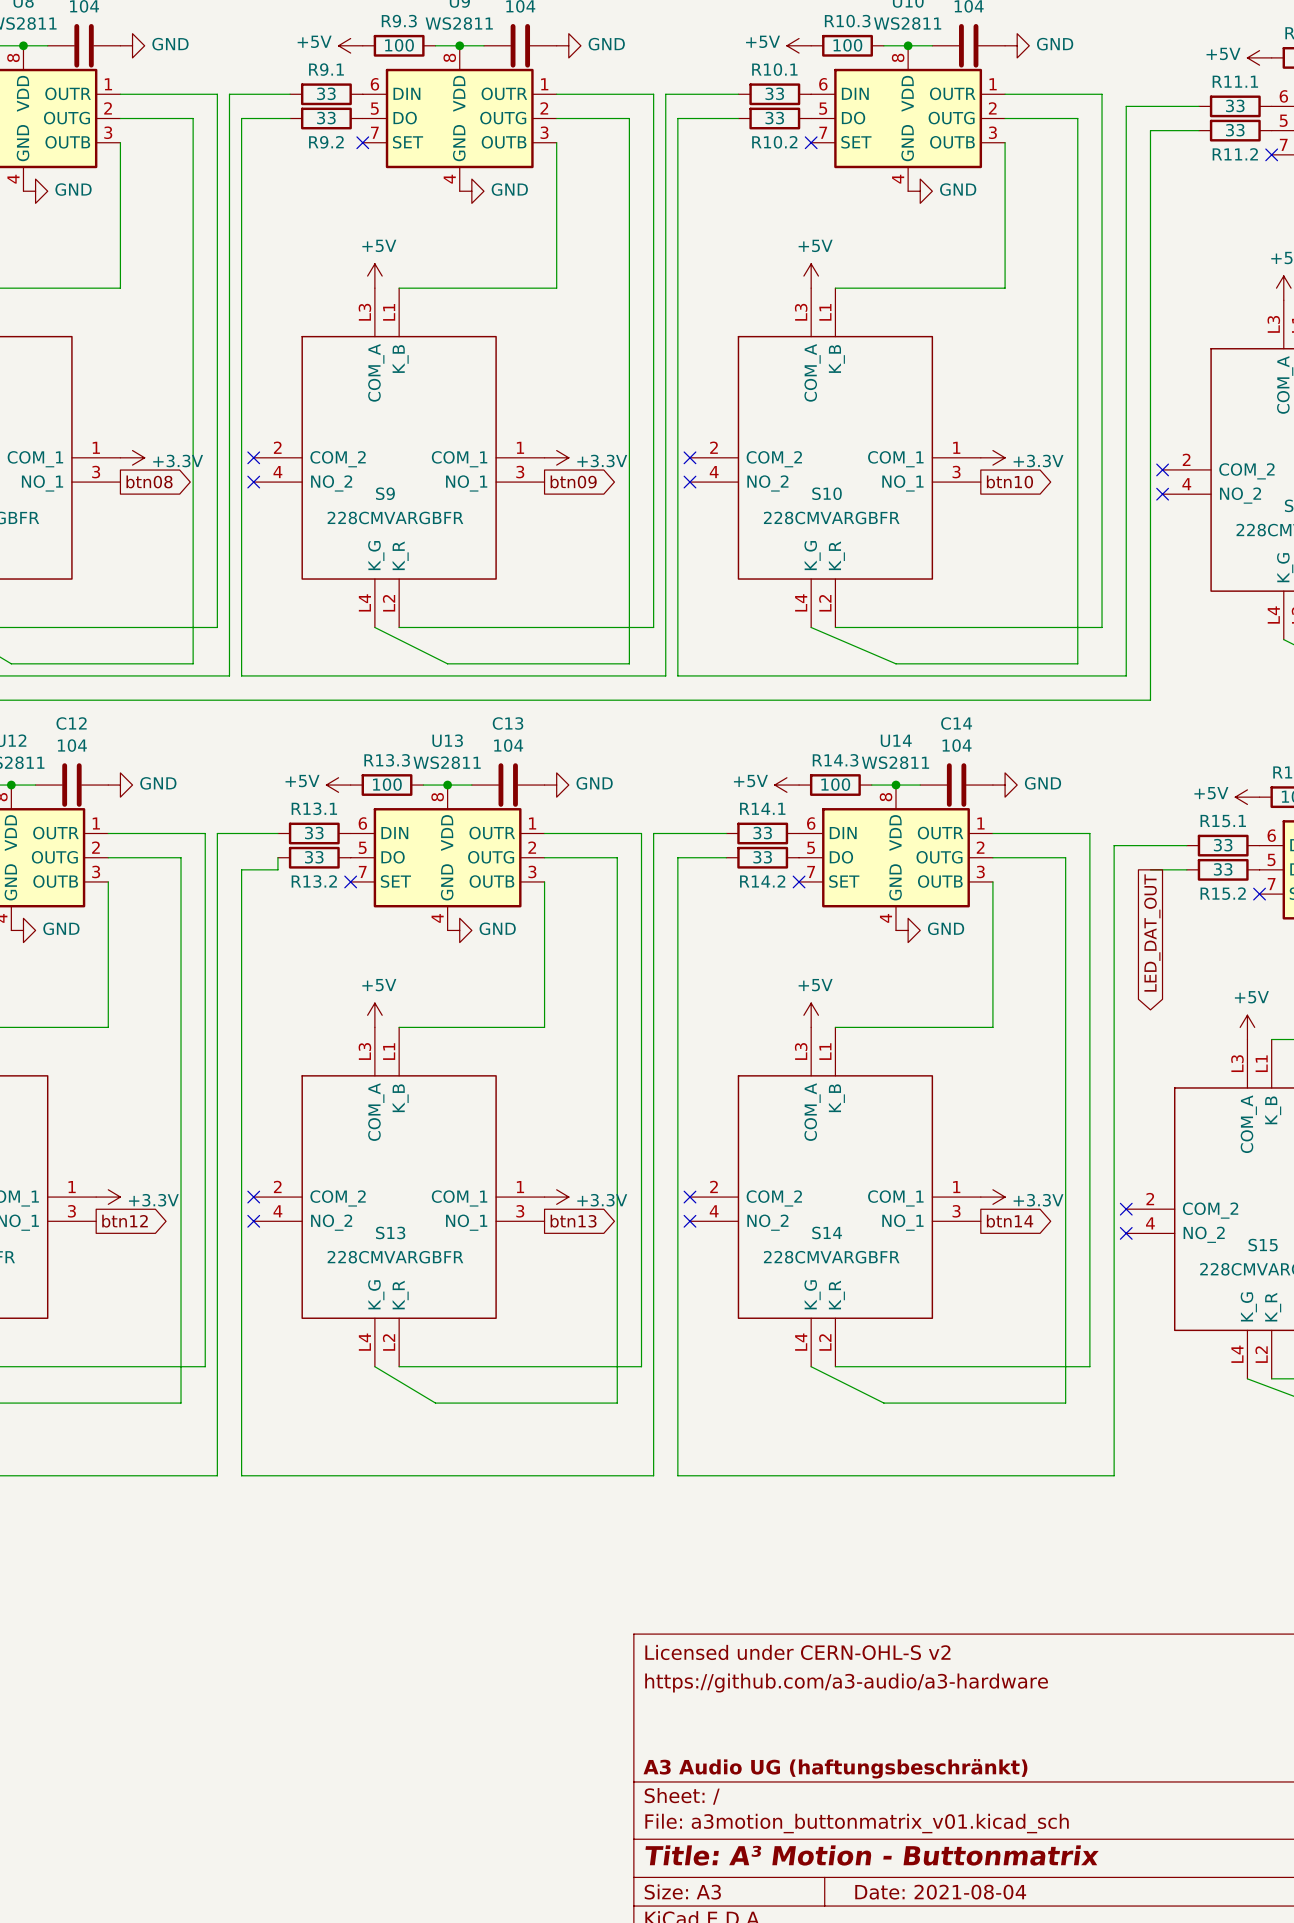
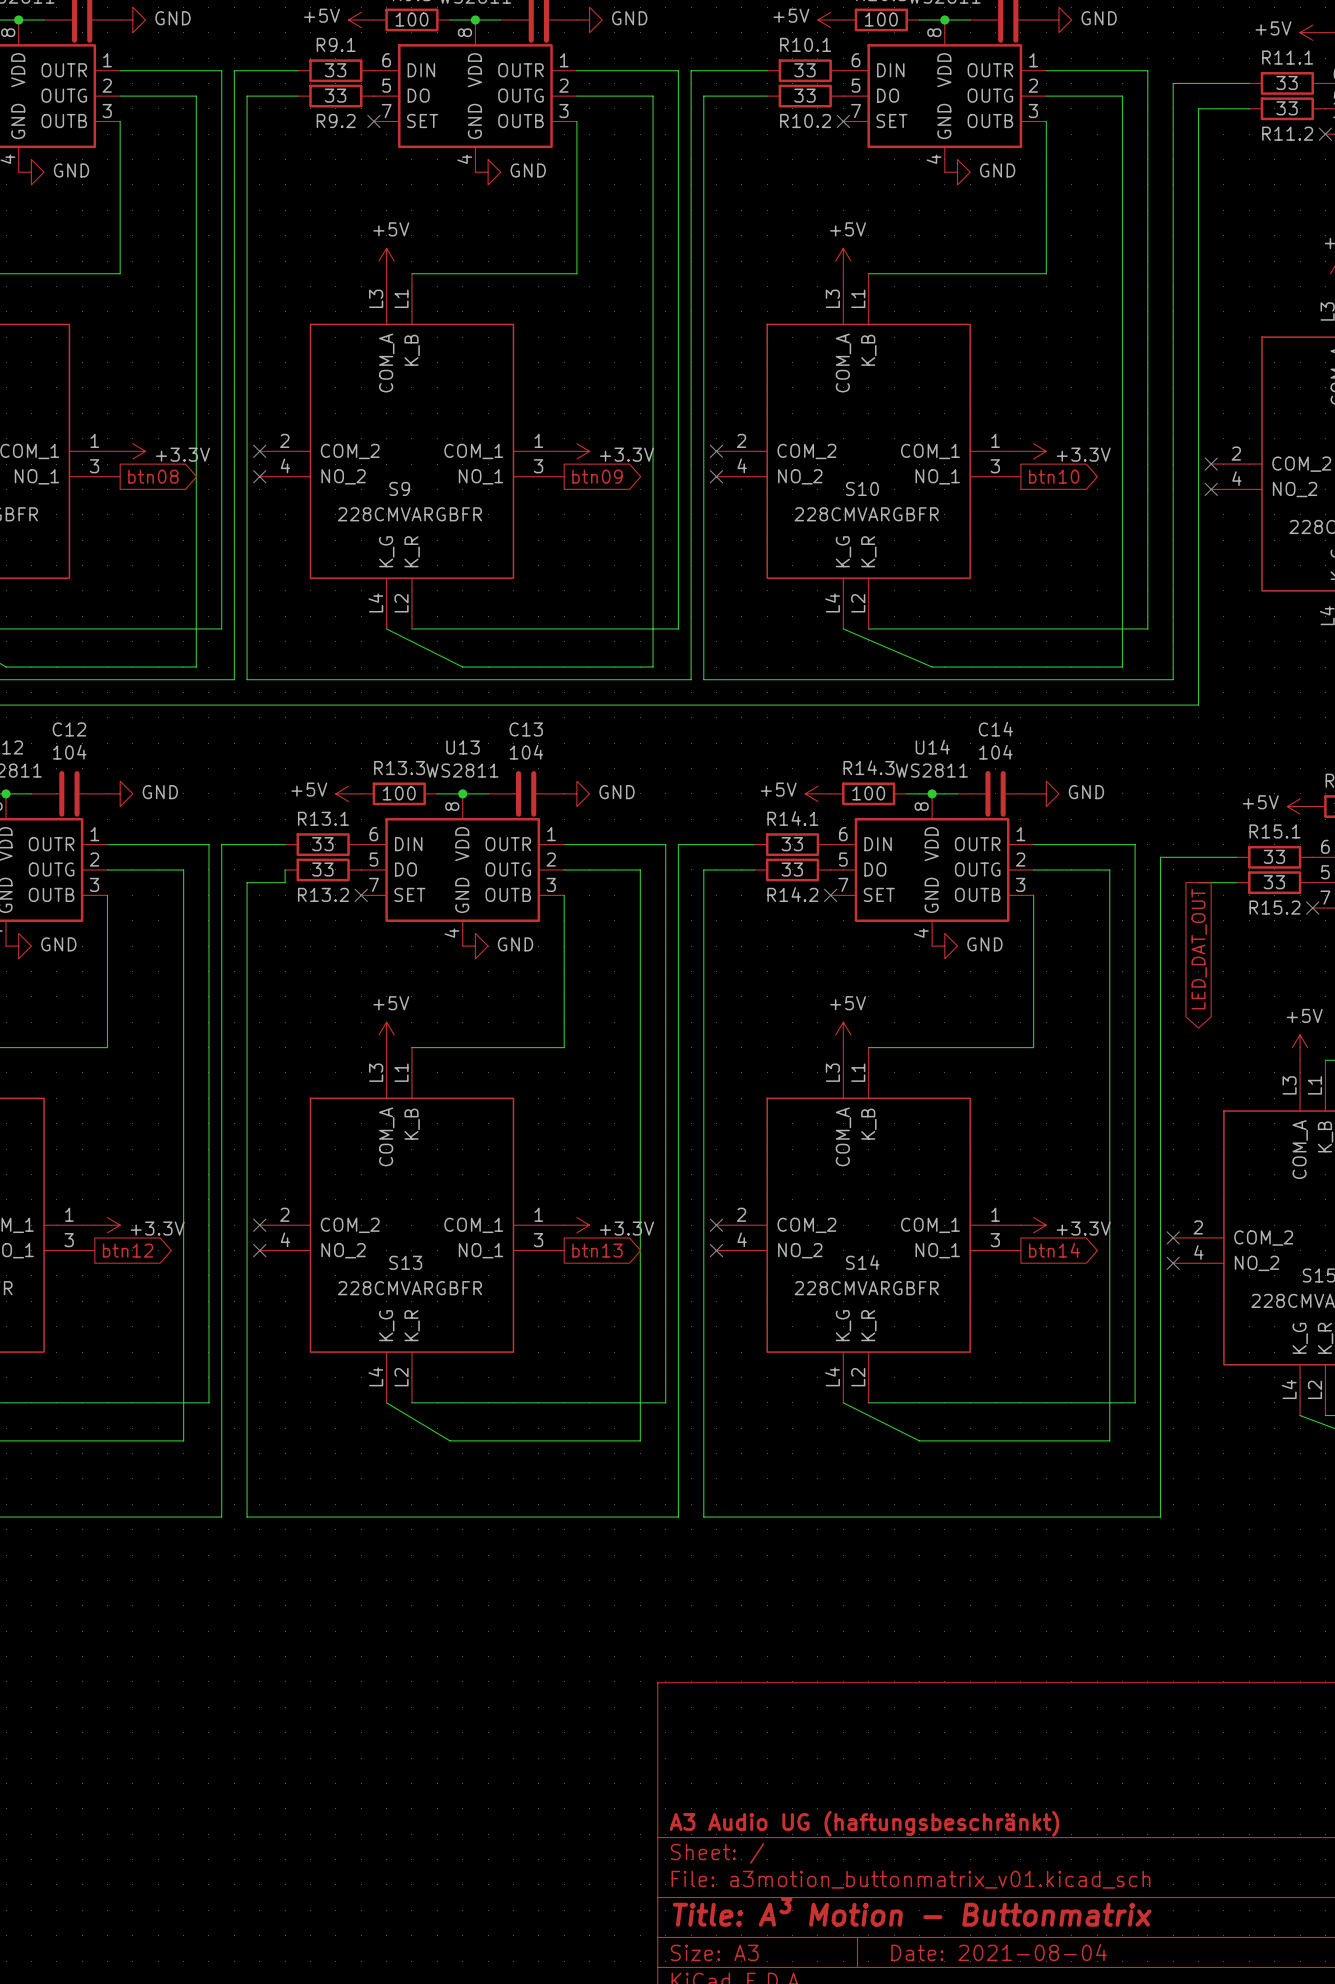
title block: Licensed under CERN-OHL-S v2 (797, 1652) -> none
title block: https://github.com/a3-audio/a3-hardware (846, 1682) -> none

